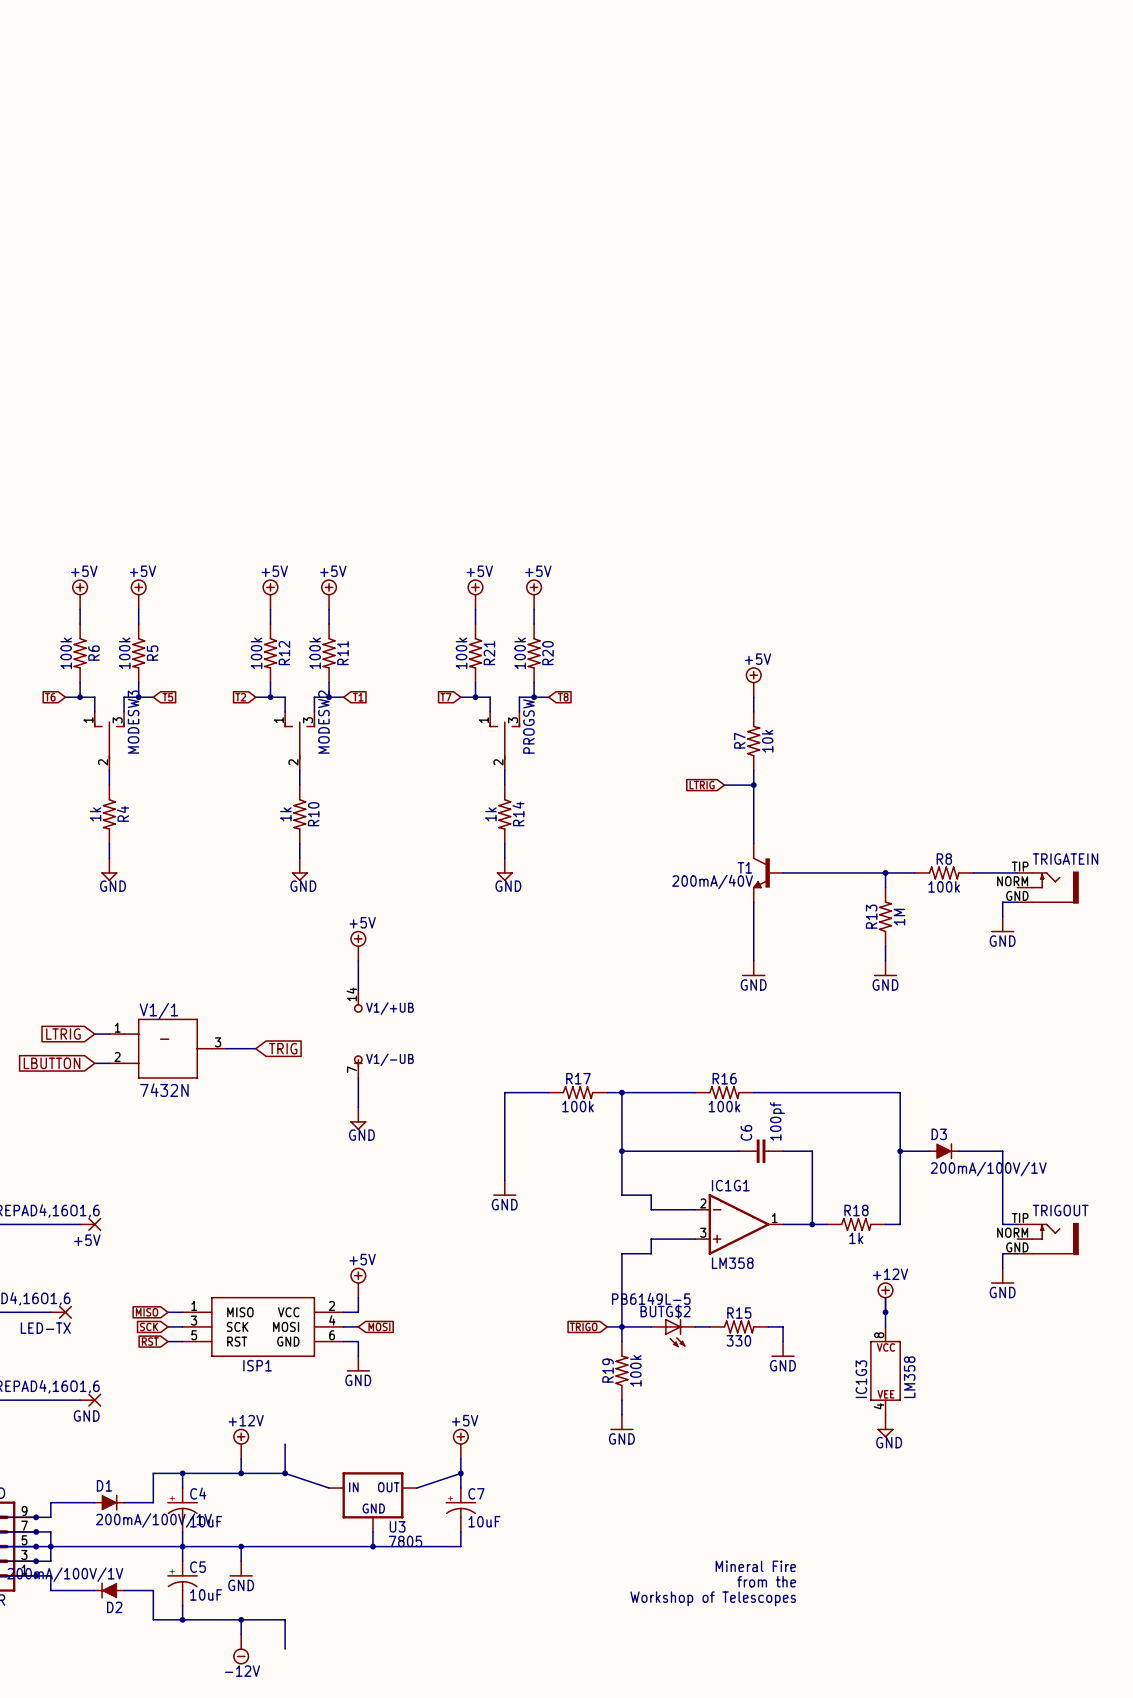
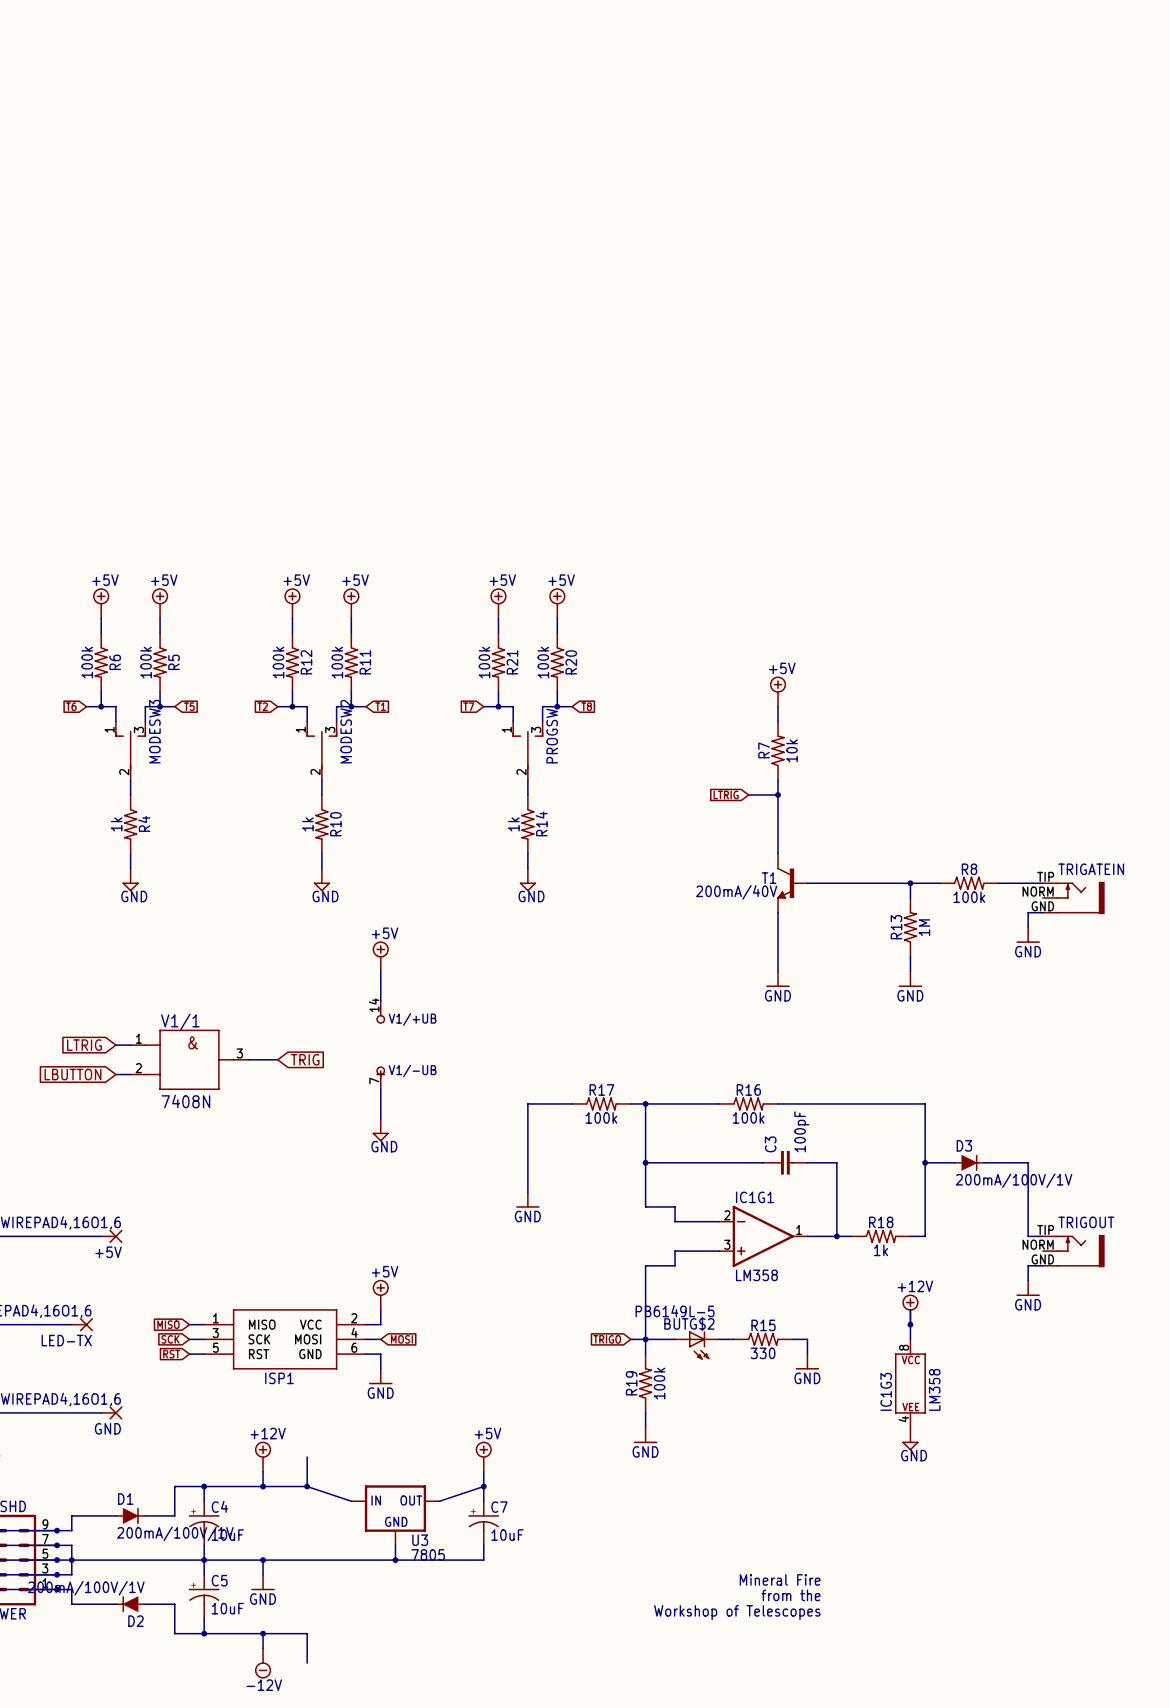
V1/1 symbol: [109, 1018, 227, 1079] -> [130, 1029, 249, 1090]
V1/1 value: 7432N (164, 1090) -> 7408N (185, 1101)
C6 value: 100pf (777, 1121) -> 100pF (801, 1131)
C6 name: C6 (746, 1132) -> C3 (770, 1144)

